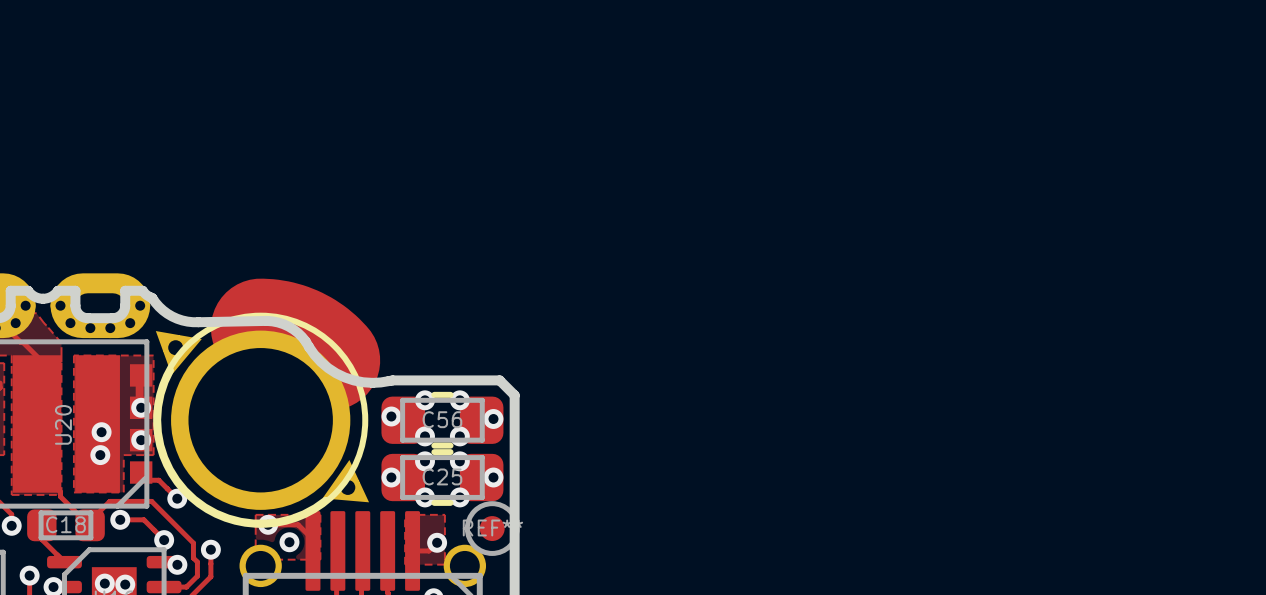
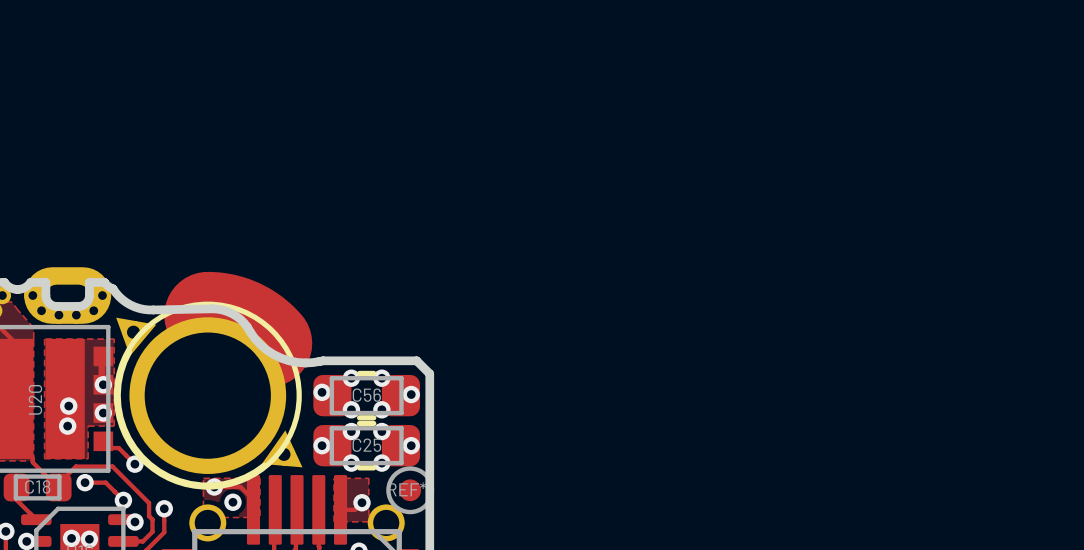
line: (144, 478) (117, 506) -> none

